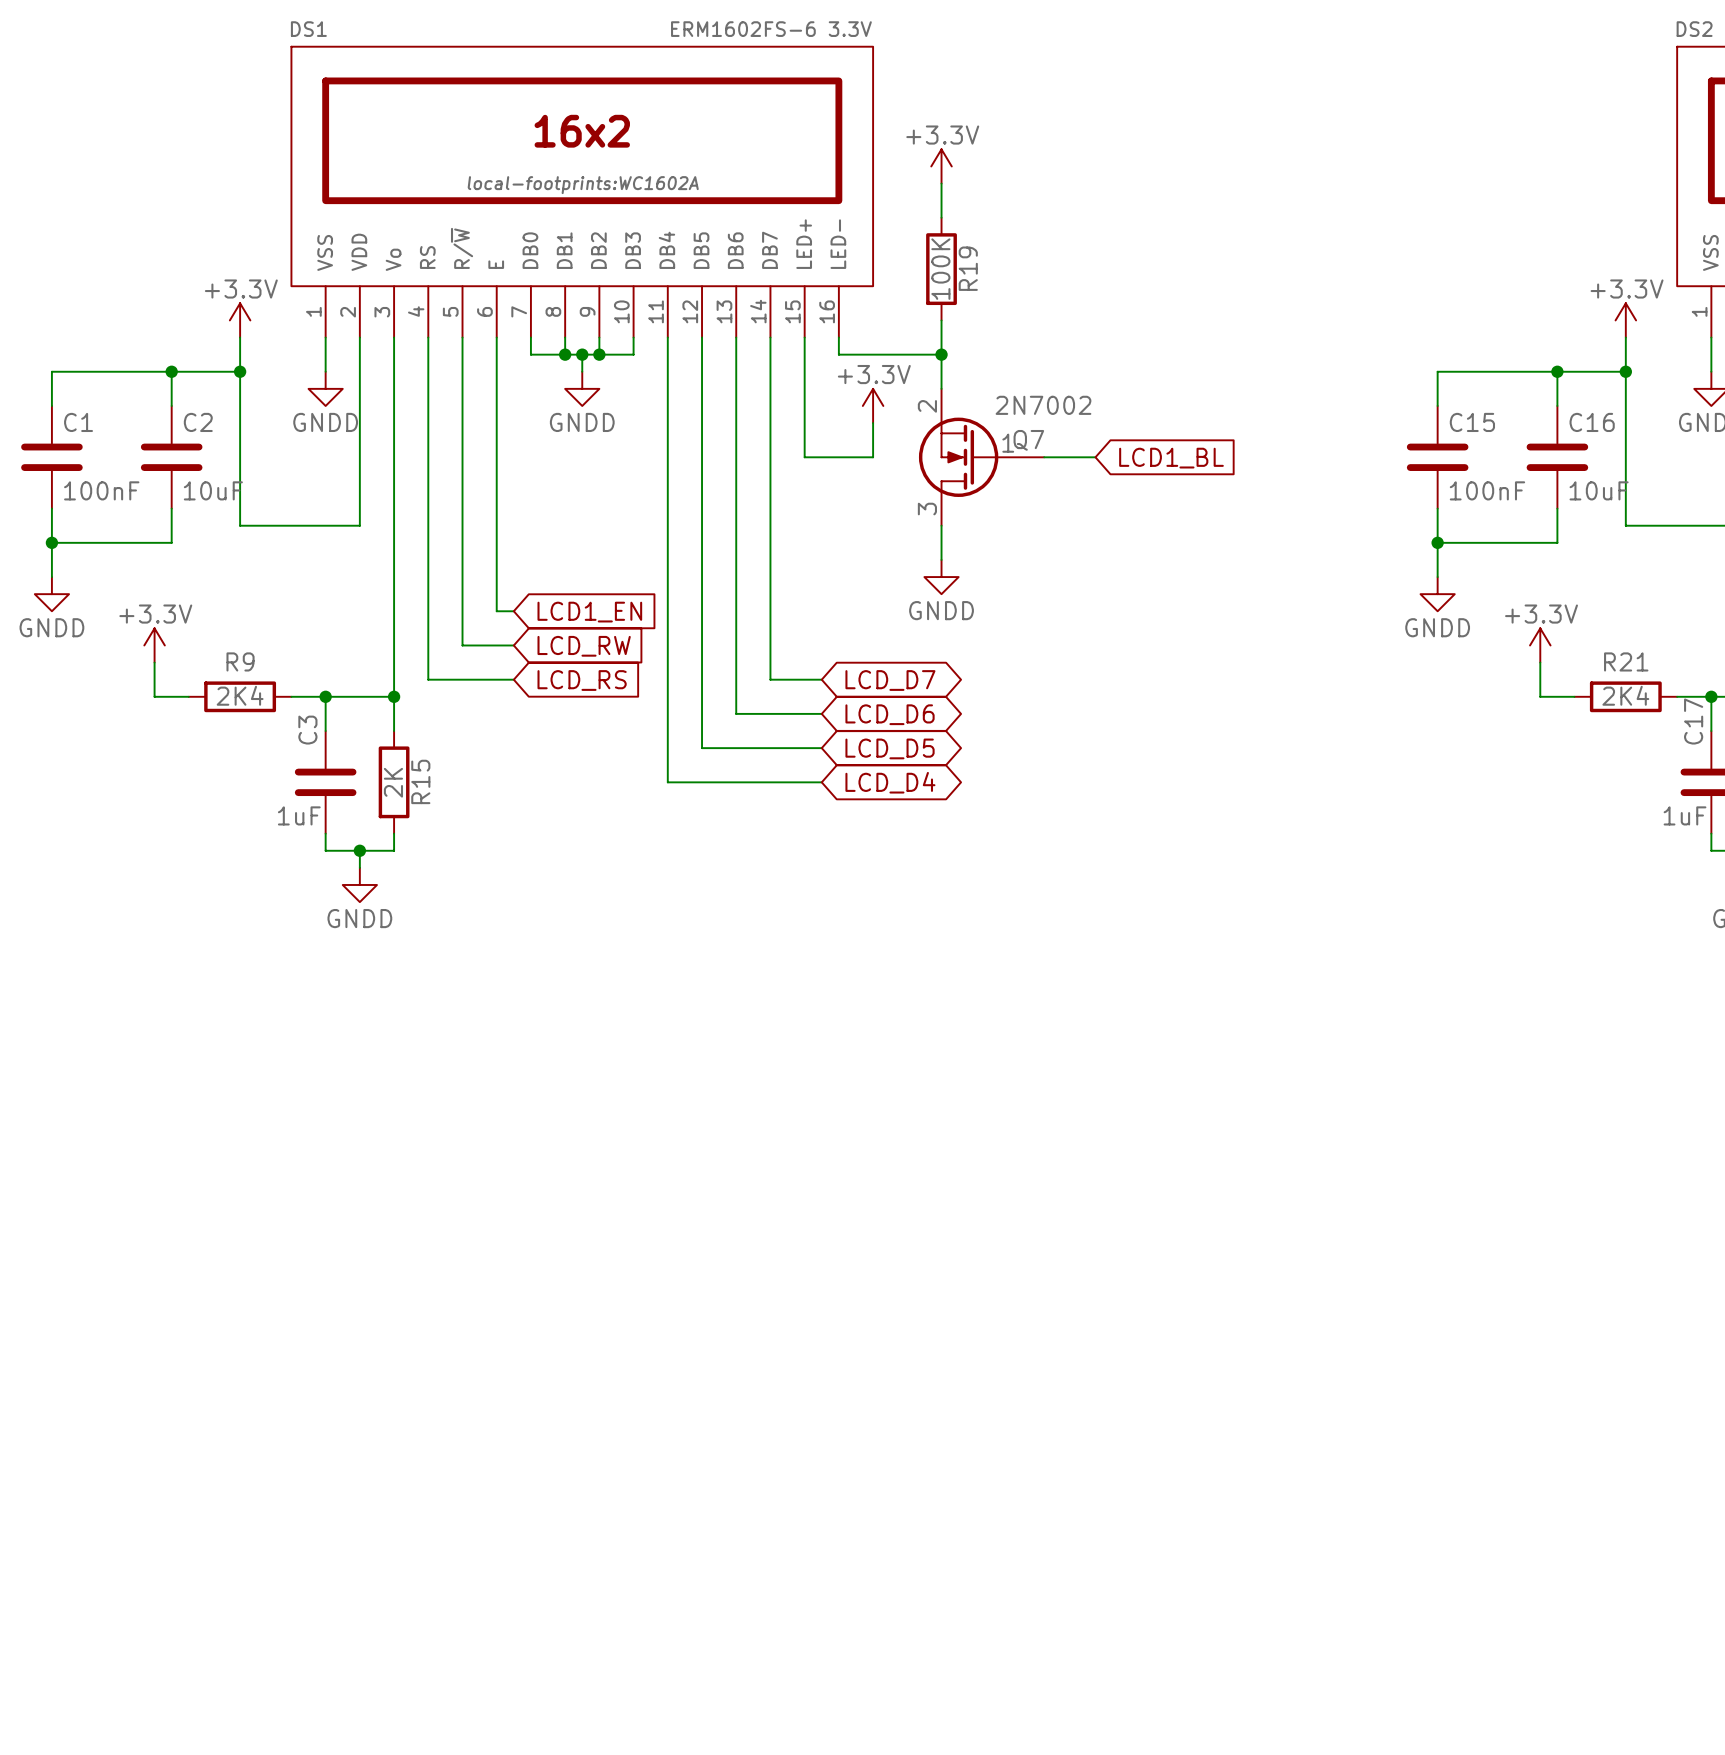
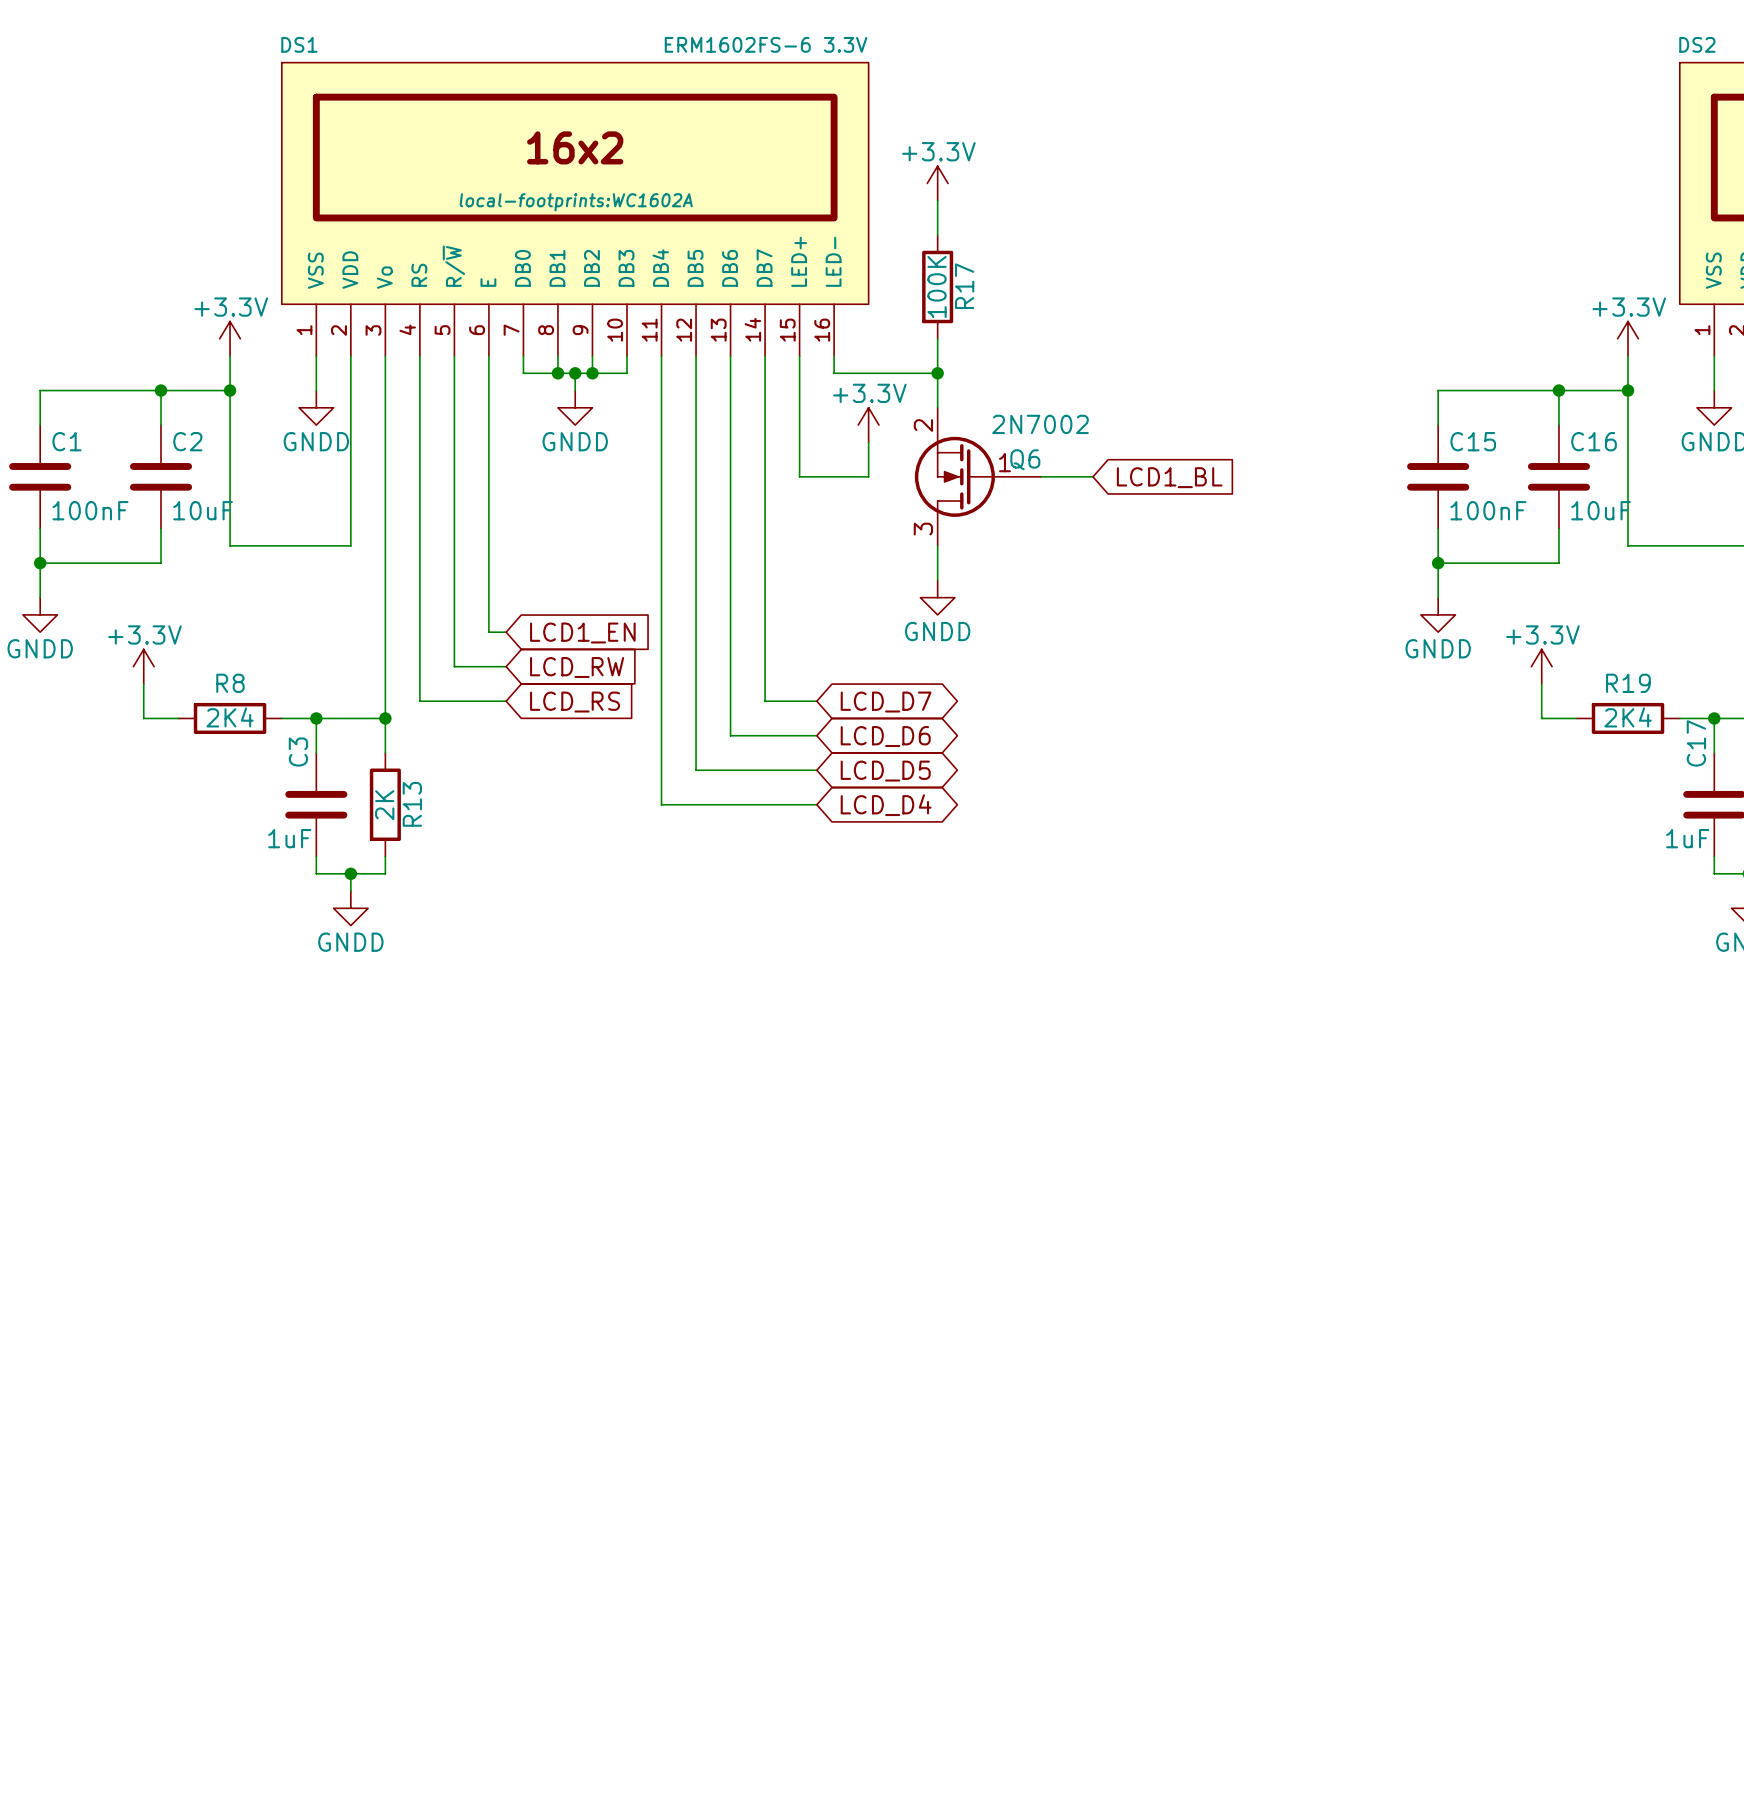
R19 name: R19 (968, 268) -> R17 (964, 286)
Q7 name: Q7 (1028, 440) -> Q6 (1025, 459)
R9 name: R9 (240, 661) -> R8 (230, 683)
R21 name: R21 (1626, 661) -> R19 (1628, 683)
R15 name: R15 (420, 781) -> R13 (412, 804)

